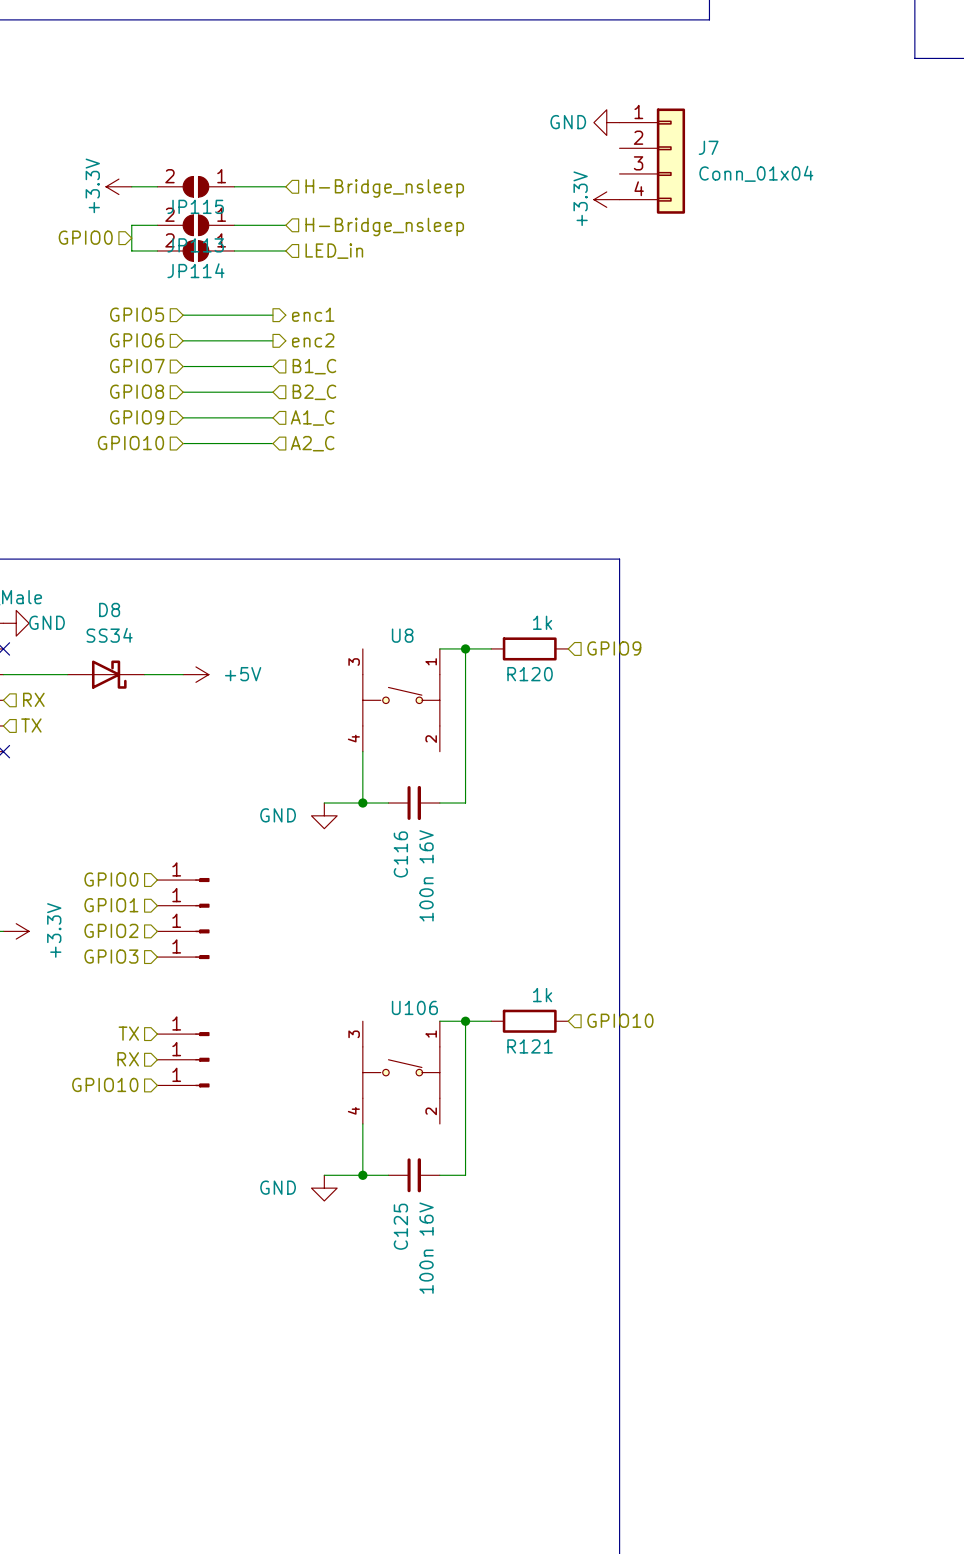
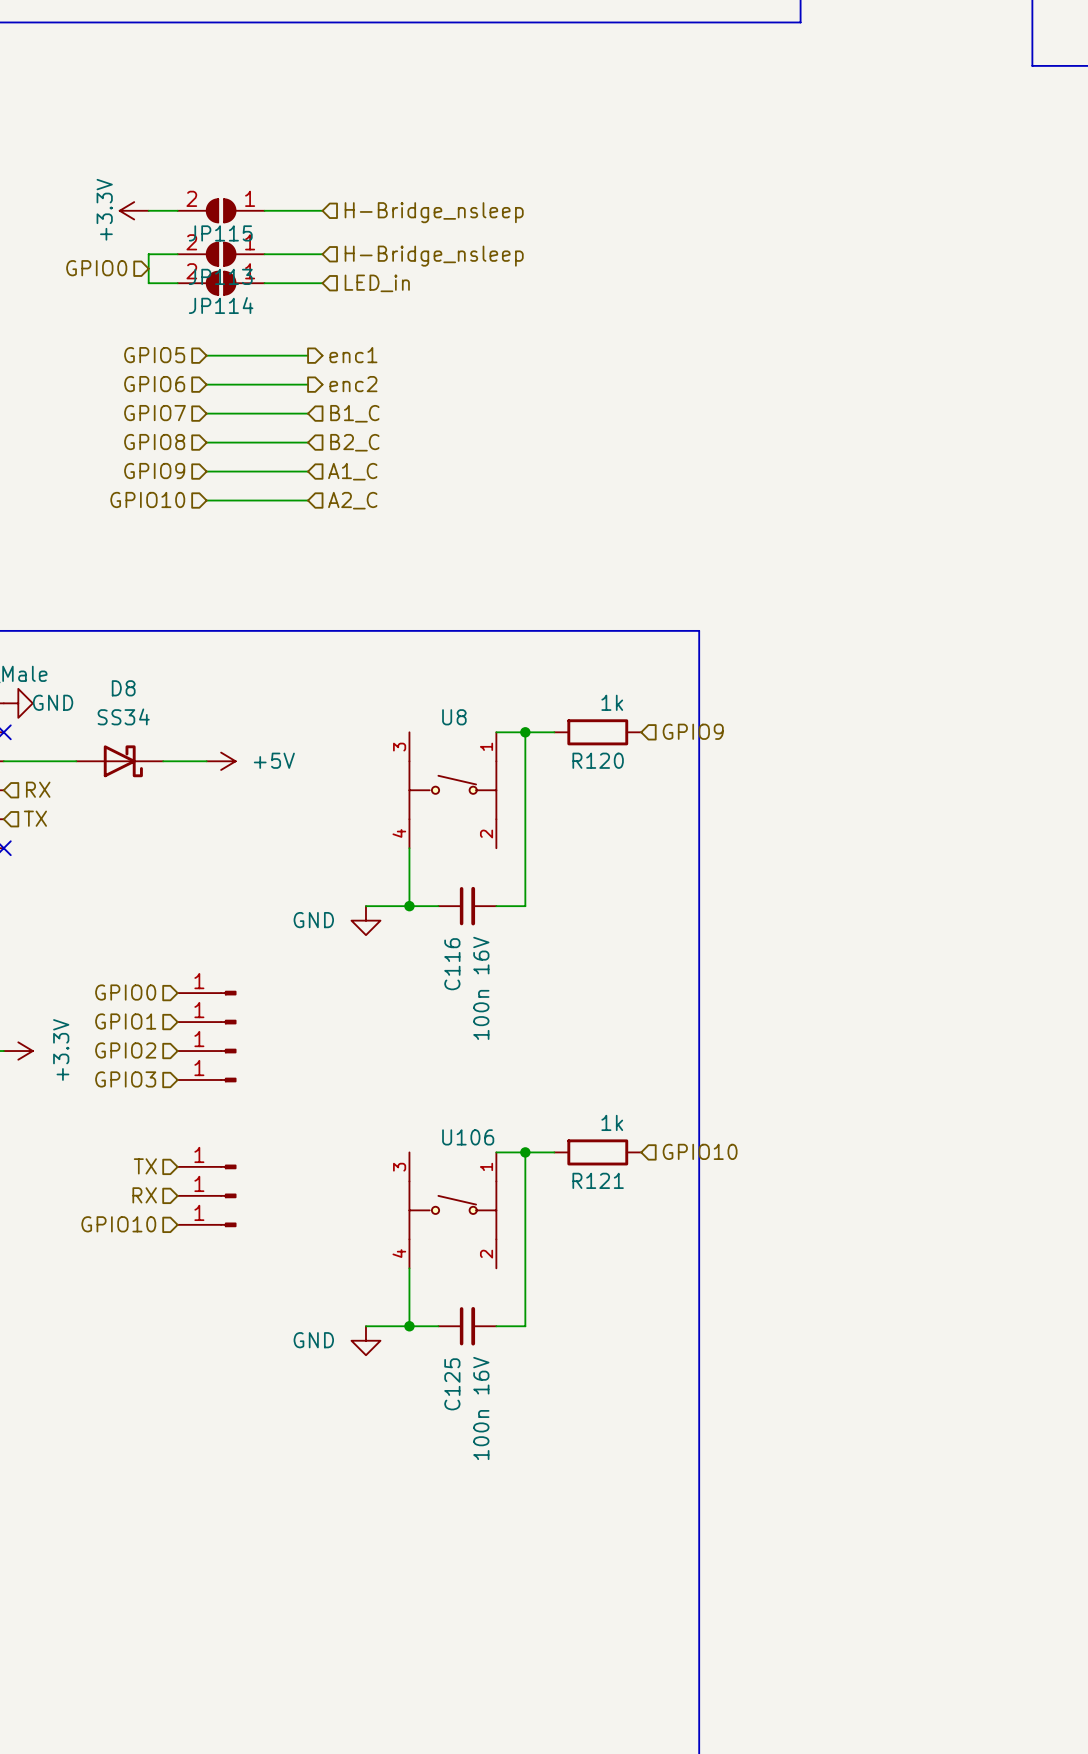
power symbol: GND (606, 122) -> none
J7: Conn_01x04 (652, 161) -> none
power symbol: +3.3V (606, 199) -> none

